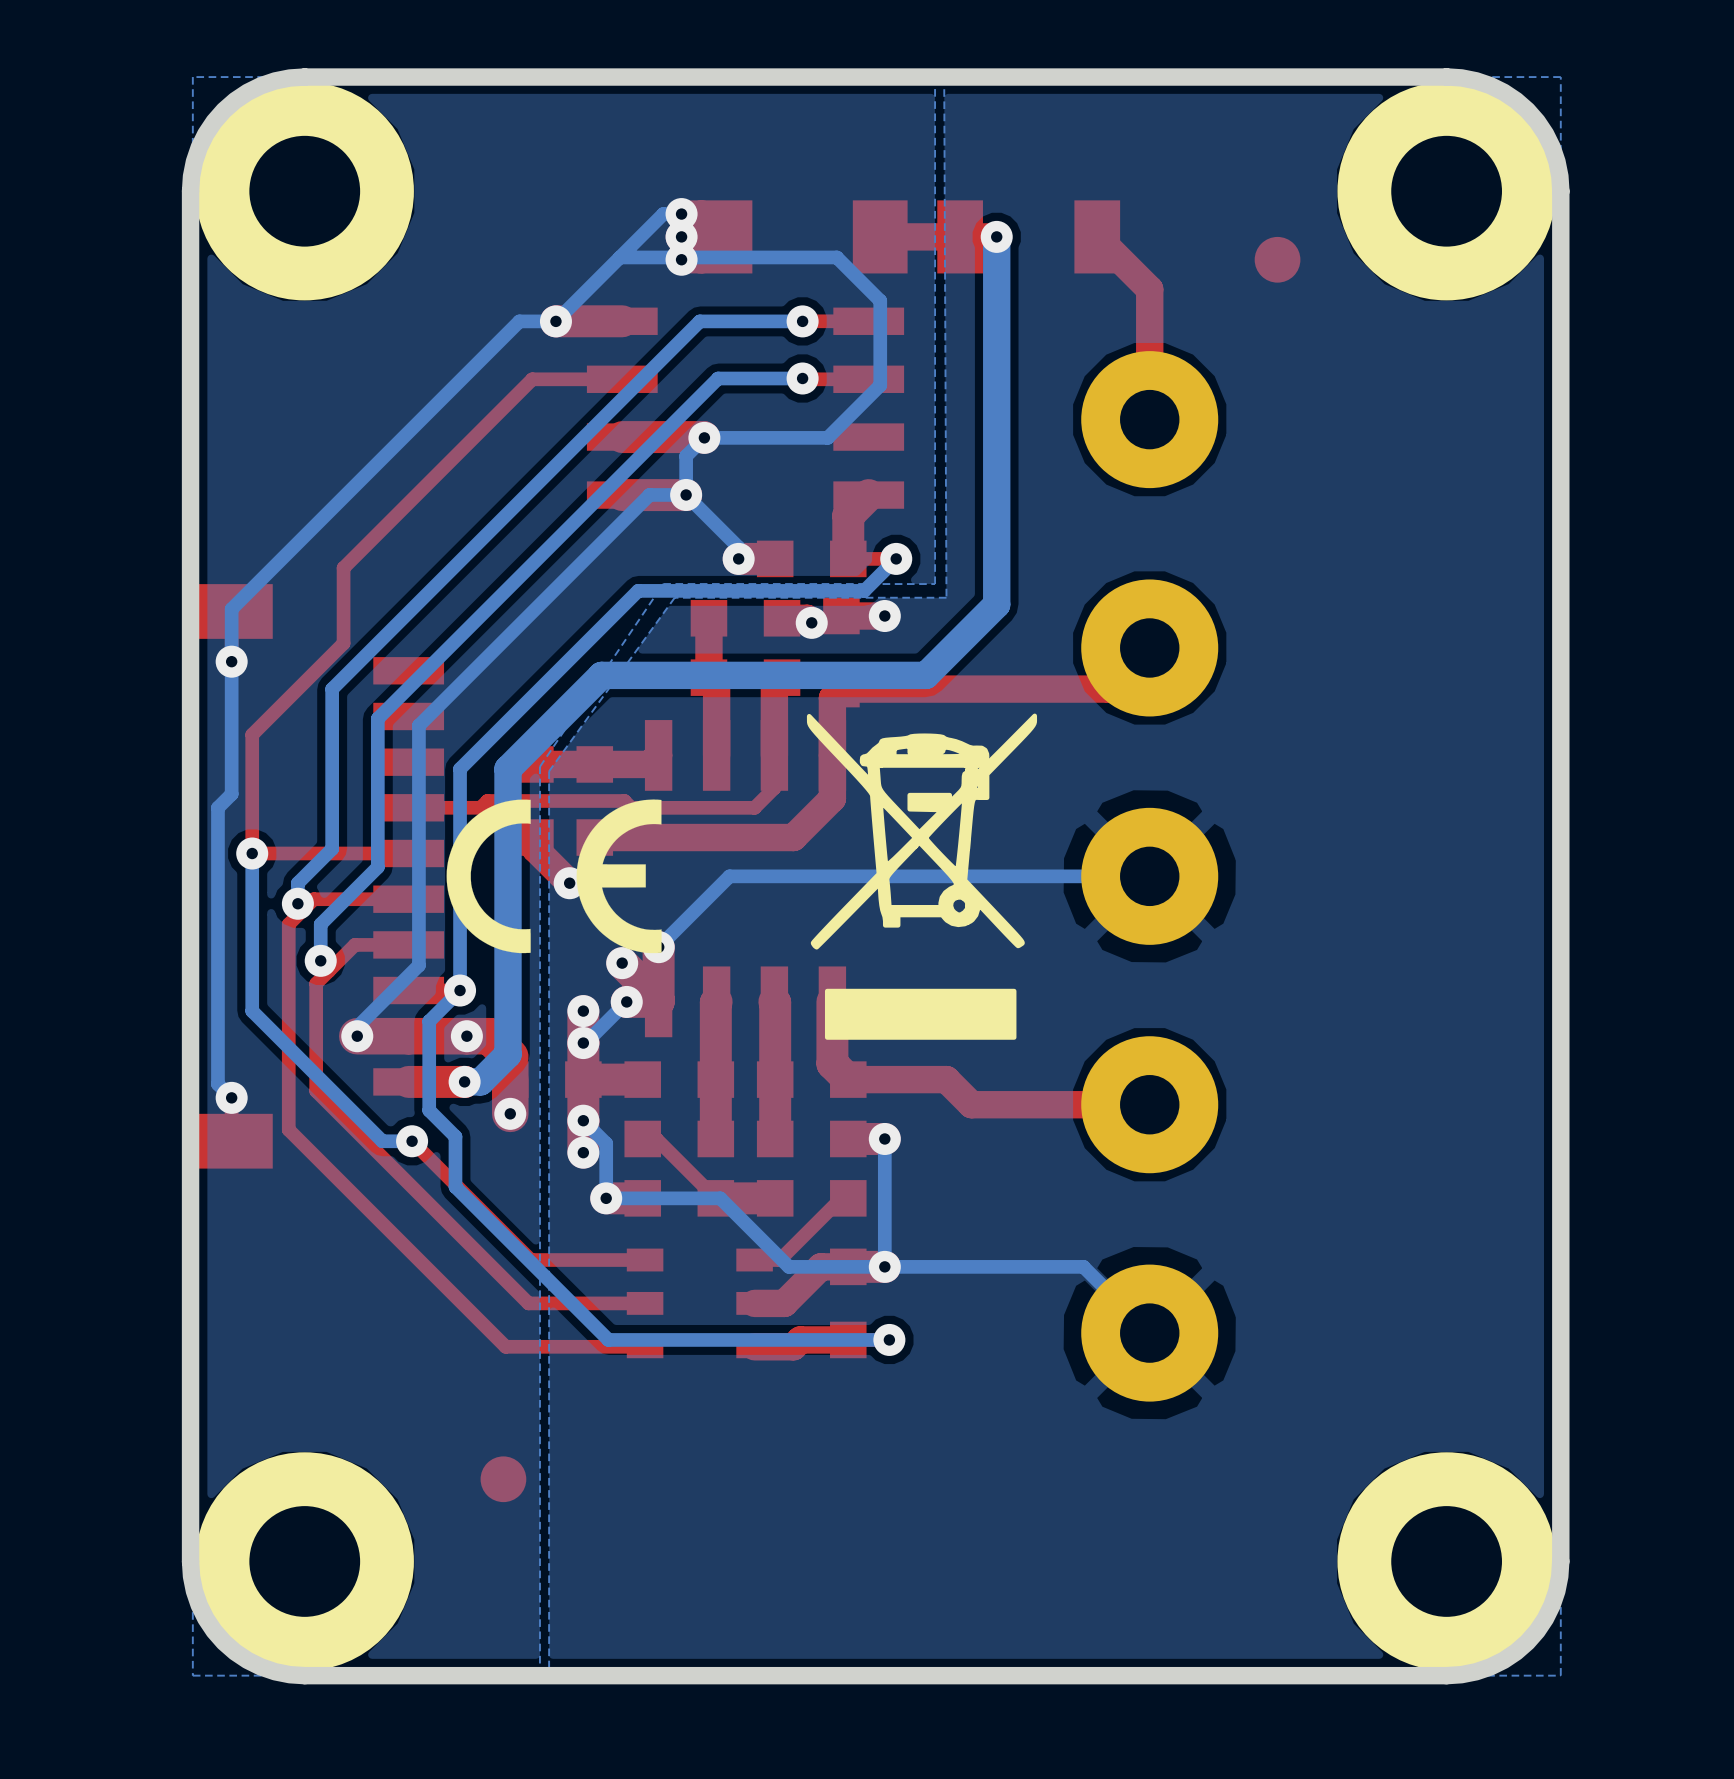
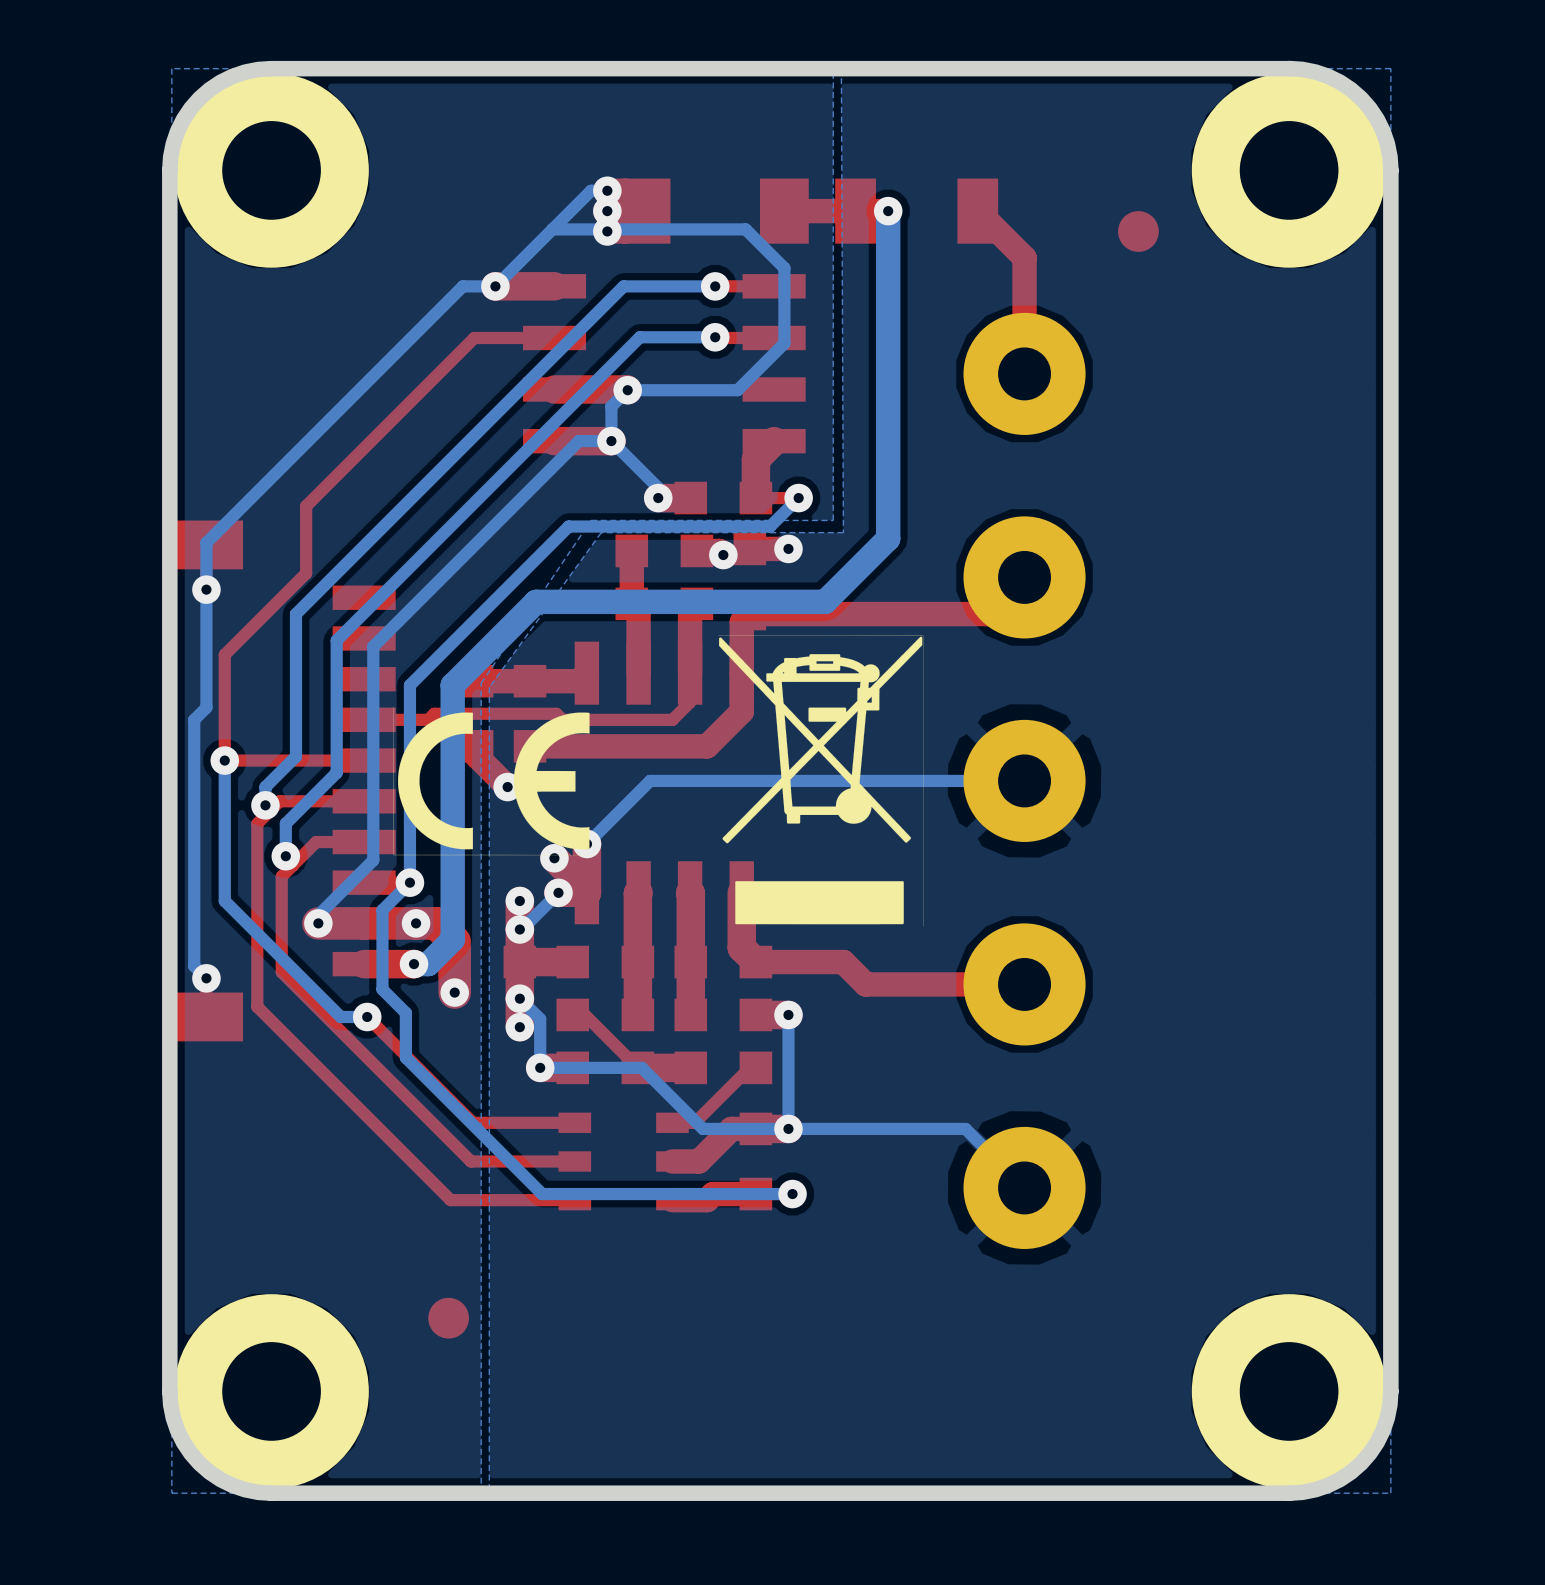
drawing shape: [806, 713, 1038, 1040] -> [718, 635, 924, 927]
drawing shape: [446, 799, 662, 954] -> [393, 706, 598, 856]

